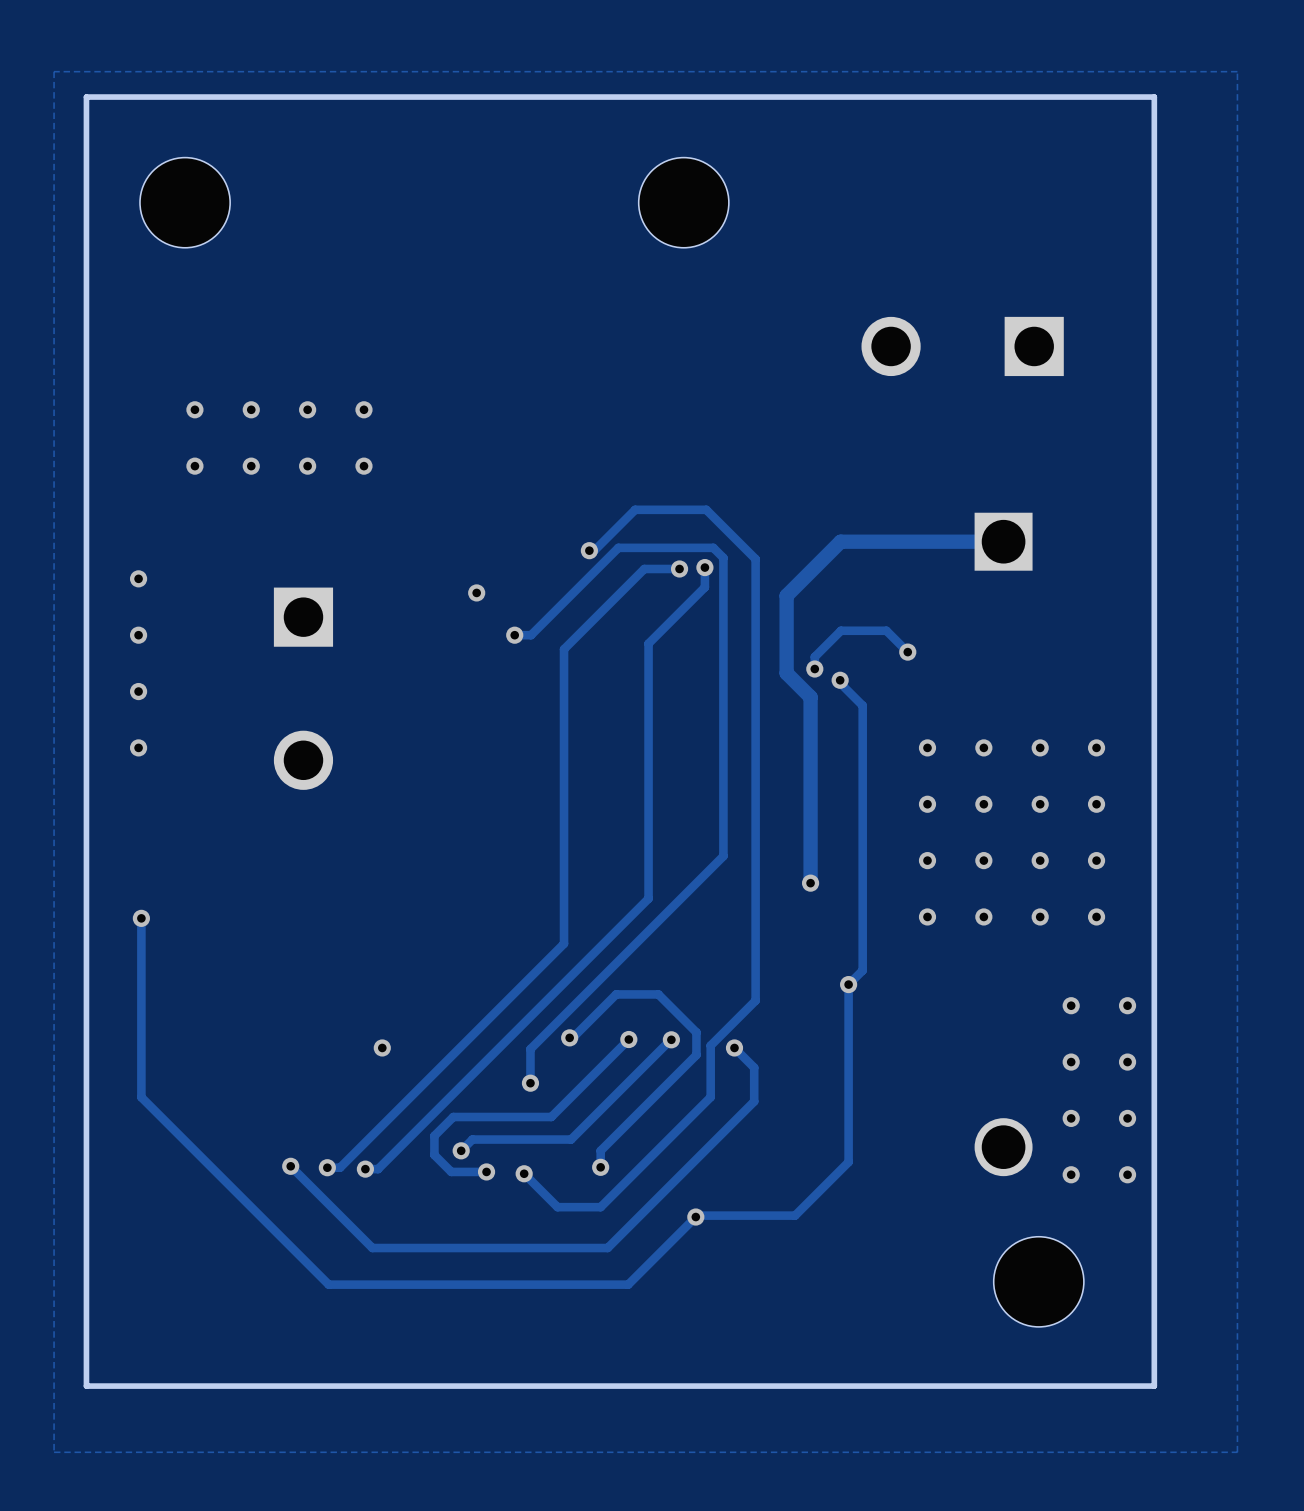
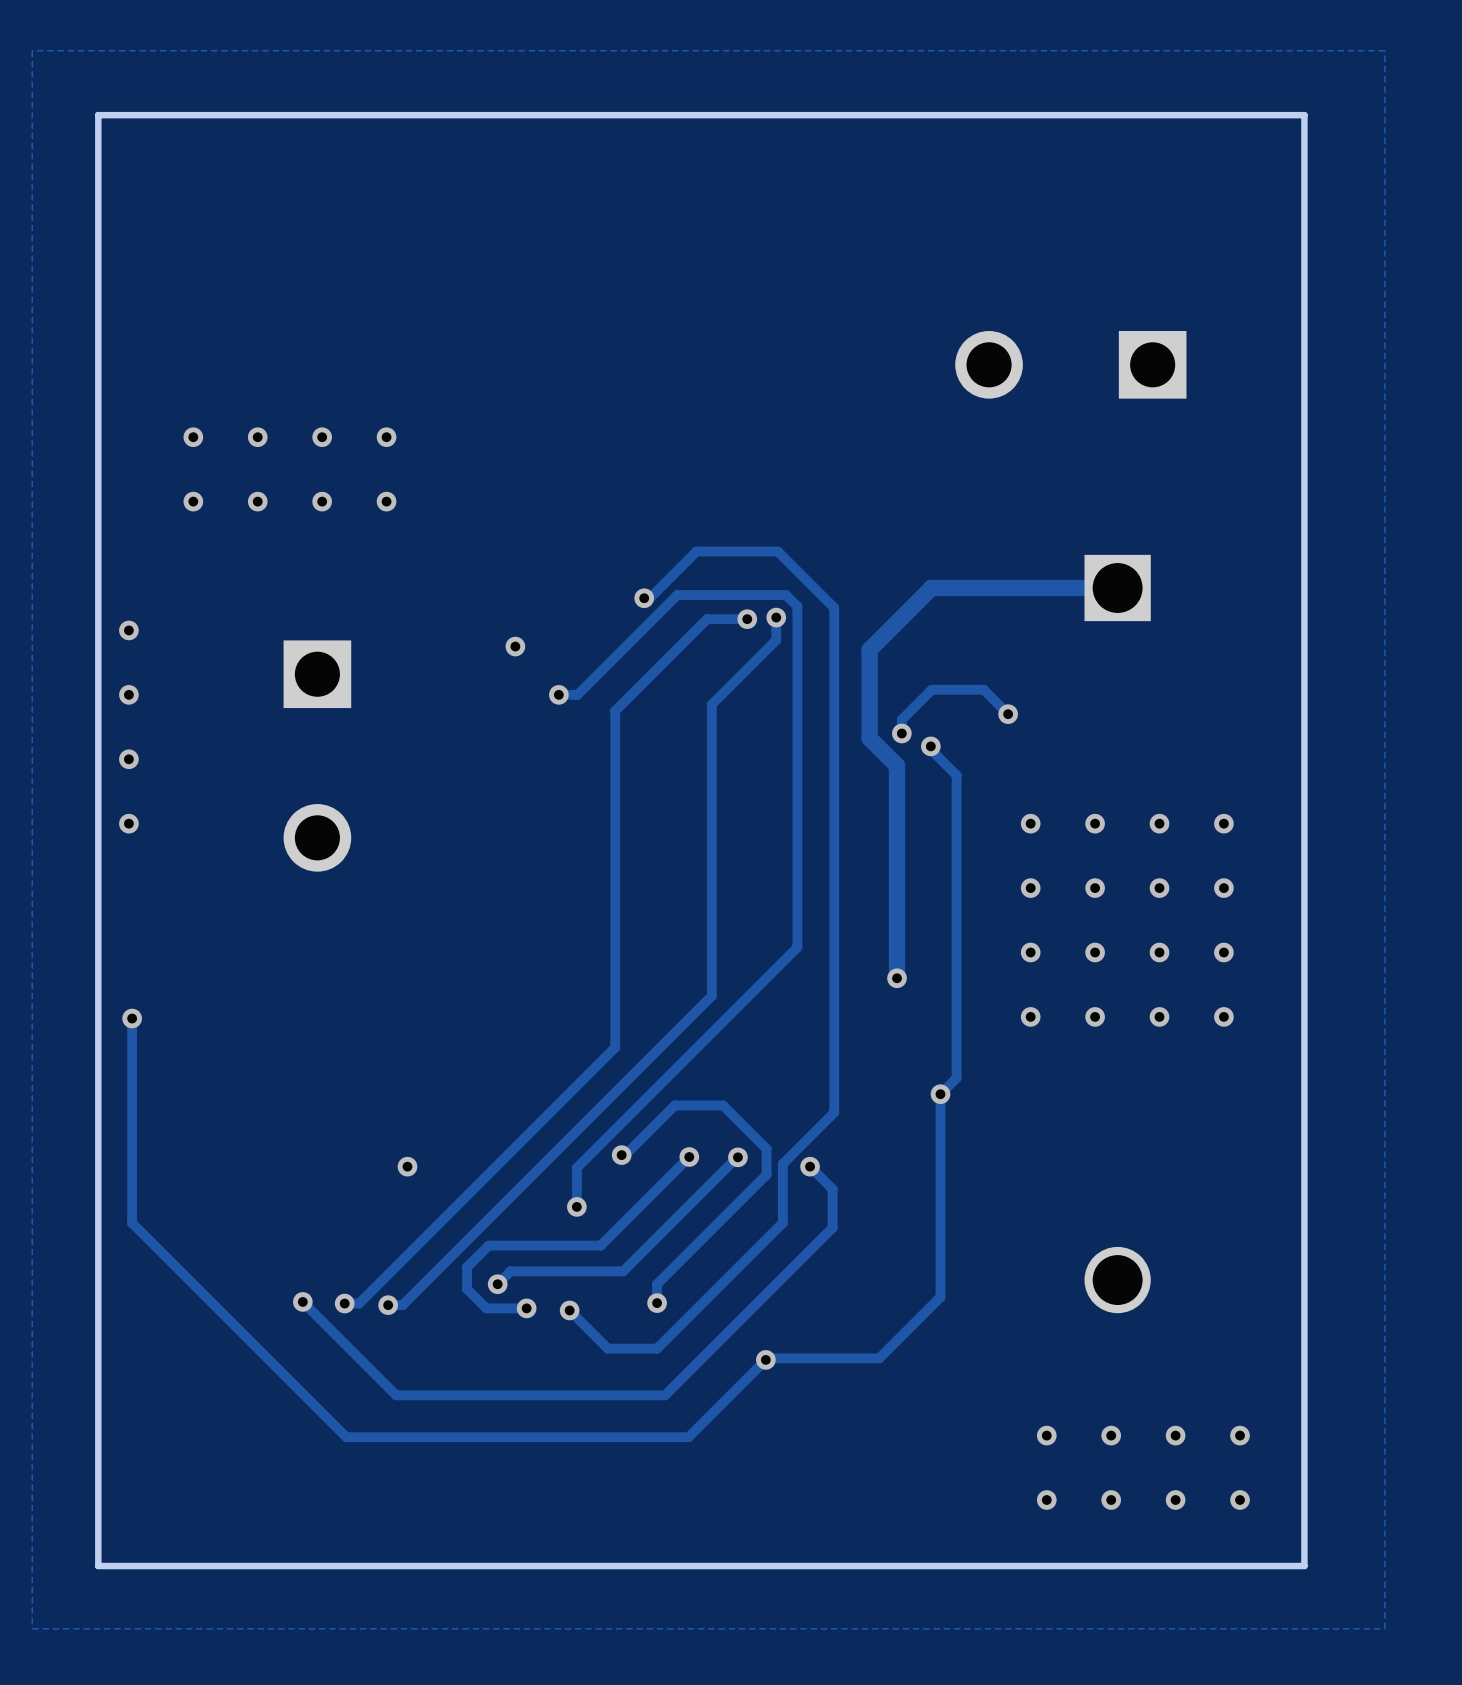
board edge: (1154, 97) (86, 97) (86, 1386) (1154, 1386) (1154, 97) -> (1304, 115) (1304, 1566) (98, 1566) (98, 115) (1304, 115)
part: (185, 202) -> none
part: (683, 202) -> none
via: (1071, 1005) -> none
via: (1127, 1005) -> none
via: (1071, 1062) -> none
via: (1127, 1062) -> none
via: (1071, 1118) -> none
via: (1127, 1118) -> none
via: (1071, 1174) -> none
via: (1127, 1174) -> none
part: (1038, 1281) -> none
via: none -> (1046, 1435)
via: none -> (1111, 1435)
via: none -> (1175, 1435)
via: none -> (1240, 1435)
via: none -> (1046, 1500)
via: none -> (1111, 1500)
via: none -> (1175, 1500)
via: none -> (1240, 1500)

